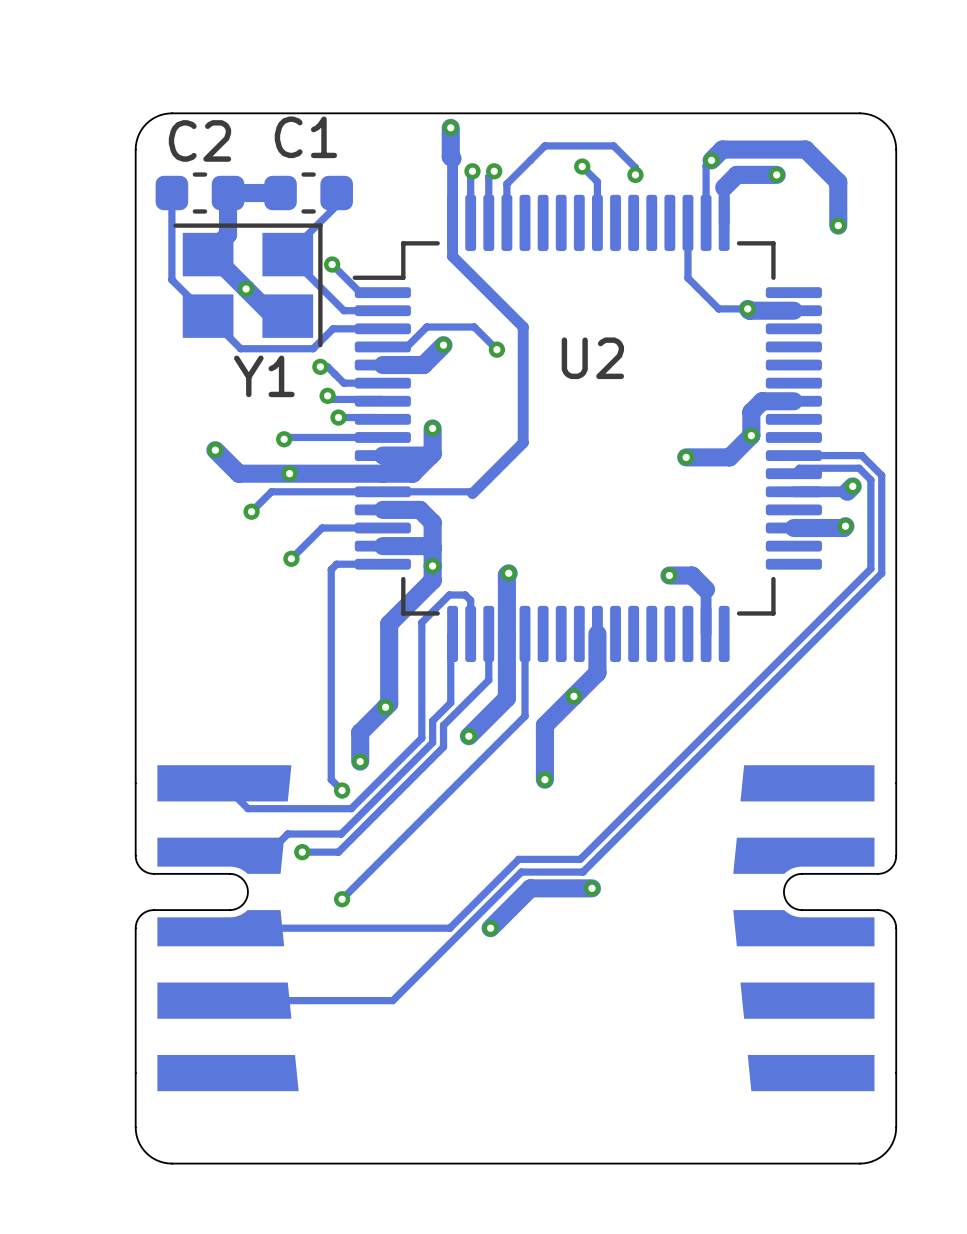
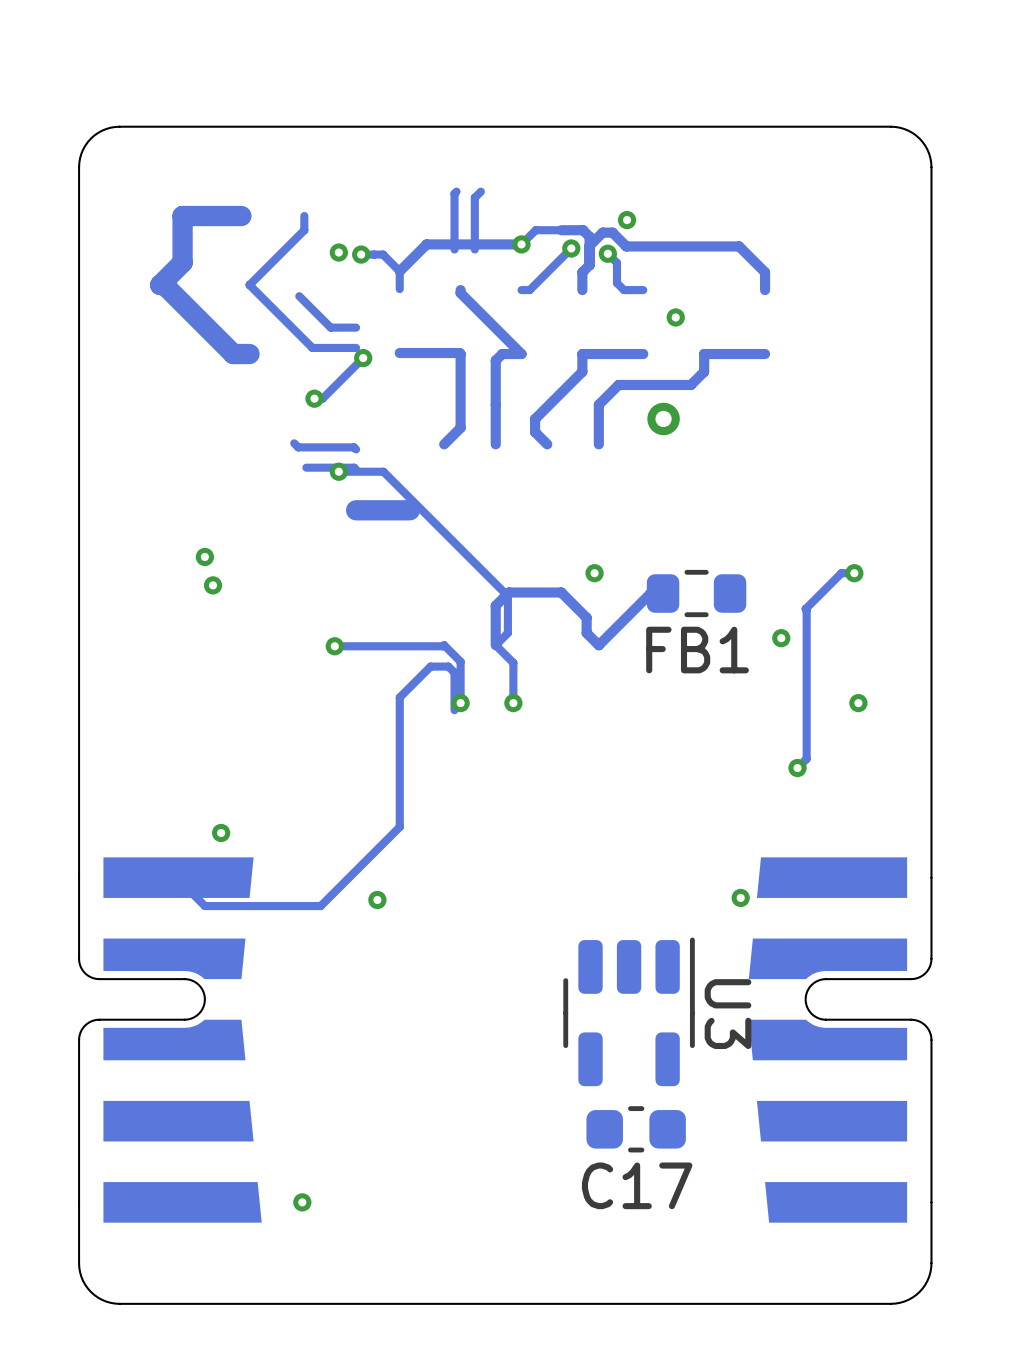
track: (450, 127) (452, 256) (523, 327) (523, 442) (472, 493) (470, 491) (271, 491) (251, 511) -> none
via: (450, 127) -> none
via: (711, 160) -> none
track: (582, 166) (597, 181) (597, 222) -> none
via: (582, 166) -> none
via: (472, 171) -> none
via: (494, 171) -> none
track: (635, 174) (635, 167) (613, 145) (544, 145) (506, 183) (506, 222) -> none
via position: (635, 174) -> (627, 220)
track: (776, 174) (736, 174) (724, 187) (724, 222) -> none
via: (776, 174) -> none
track: (171, 193) (171, 279) (240, 348) (313, 348) (333, 328) (382, 328) -> none
C2: (199, 193) -> none
C1: (308, 193) -> none
via: none -> (521, 244)
track: none -> (589, 245) (602, 232) (612, 232) (626, 246) (739, 246) (765, 272) (765, 290)
track: none -> (571, 248) (529, 290) (521, 290)
via: none -> (571, 248)
track: (687, 222) (687, 278) (718, 308) (793, 310) -> none
track: (706, 222) (706, 165) (722, 149) (805, 149) (838, 182) (838, 225) -> none
via: none -> (338, 252)
via: (838, 225) -> none
track: none -> (607, 253) (616, 262) (616, 283) (624, 290) (643, 290)
via: none -> (607, 253)
track: none -> (361, 254) (382, 254) (399, 271)
via: none -> (361, 254)
track: none -> (399, 271) (399, 289)
track: none -> (399, 271) (426, 244) (521, 244) (535, 230) (583, 230) (589, 236) (589, 265) (582, 272) (582, 290)
track: none -> (460, 290) (460, 293) (521, 354) (502, 354) (495, 360) (495, 444)
via: (332, 264) -> none
via: none -> (675, 317)
Y1: (247, 285) -> none
via: (246, 288) -> none
via: (747, 308) -> none
track: none -> (399, 353) (460, 354) (460, 427) (444, 444)
track: none -> (643, 354) (582, 354) (582, 371) (535, 419) (535, 432) (547, 444)
track: none -> (765, 354) (704, 354) (704, 371) (690, 384) (618, 384) (598, 404) (598, 444)
track: none -> (363, 358) (322, 398) (314, 398)
via: none -> (363, 358)
track: (443, 345) (423, 365) (382, 365) -> none
via: (443, 345) -> none
track: (382, 346) (406, 346) (426, 327) (474, 327) (496, 349) -> none
via: (496, 349) -> none
via: none -> (314, 398)
track: (320, 366) (327, 366) (343, 383) (382, 383) -> none
via: (320, 366) -> none
via: none -> (663, 418)
via: (327, 395) -> none
track: (793, 401) (762, 401) (751, 412) (751, 435) (729, 457) (686, 457) -> none
via: (338, 417) -> none
track: none -> (338, 471) (383, 471) (507, 596) (507, 633) (495, 645)
via: none -> (338, 471)
track: (432, 428) (432, 453) (412, 473) (238, 473) (215, 450) -> none
via: (432, 428) -> none
U2: (587, 428) -> none
via: (751, 435) -> none
track: (382, 437) (285, 437) (284, 439) -> none
via: (284, 439) -> none
via: (215, 450) -> none
track: (793, 455) (861, 455) (881, 475) (881, 573) (582, 872) (521, 872) (392, 1000) (222, 1000) -> none
via: (686, 457) -> none
via: (289, 473) -> none
track: (793, 473) (799, 468) (859, 468) (870, 479) (870, 568) (580, 859) (518, 859) (449, 928) (211, 928) -> none
track: (852, 486) (847, 491) (793, 491) -> none
via: (852, 486) -> none
via: none -> (204, 556)
track: (382, 509) (419, 509) (432, 522) (432, 580) (389, 623) (389, 703) (360, 732) (360, 761) -> none
via: (251, 511) -> none
via: none -> (594, 573)
track: none -> (854, 573) (841, 573) (805, 609) (806, 758) (797, 768)
via: none -> (854, 573)
via: none -> (213, 585)
track: (845, 526) (843, 528) (793, 528) -> none
via: (845, 526) -> none
track: (382, 528) (322, 528) (291, 558) -> none
track: none -> (664, 593) (650, 593) (598, 645) (586, 633) (586, 617) (561, 592) (508, 592) (495, 605) (495, 645)
FB1: none -> (696, 593)
track: (382, 546) (430, 546) (432, 547) -> none
via: (291, 558) -> none
track: (382, 564) (336, 564) (331, 569) (331, 779) (342, 790) -> none
via: (432, 566) -> none
via: none -> (781, 638)
track: (508, 573) (506, 575) (506, 698) (468, 736) -> none
via: (508, 573) -> none
track: none -> (495, 645) (513, 662) (513, 703)
track: (669, 575) (692, 575) (706, 589) (706, 633) -> none
via: (669, 575) -> none
track: none -> (334, 646) (444, 645) (460, 661) (460, 703)
via: none -> (334, 646)
via: none -> (460, 703)
via: none -> (513, 703)
via: none -> (858, 703)
track: (452, 633) (450, 635) (450, 702) (432, 720) (432, 742) (341, 834) (287, 834) (266, 855) (211, 855) -> none
track: (488, 633) (488, 680) (443, 725) (443, 747) (338, 852) (302, 852) -> none
track: (525, 633) (525, 716) (342, 899) -> none
track: (597, 633) (597, 672) (544, 725) (544, 779) -> none
via: none -> (797, 768)
via: (573, 696) -> none
via: (385, 707) -> none
via: (468, 736) -> none
via: none -> (221, 832)
via: (360, 761) -> none
via: (544, 779) -> none
via: (342, 790) -> none
via: none -> (740, 897)
via: none -> (377, 899)
via: (302, 852) -> none
track: (592, 888) (530, 888) (490, 928) -> none
via: (592, 888) -> none
via: (342, 899) -> none
U3: none -> (629, 1011)
via: (490, 928) -> none
C17: none -> (636, 1129)
via: none -> (302, 1202)

